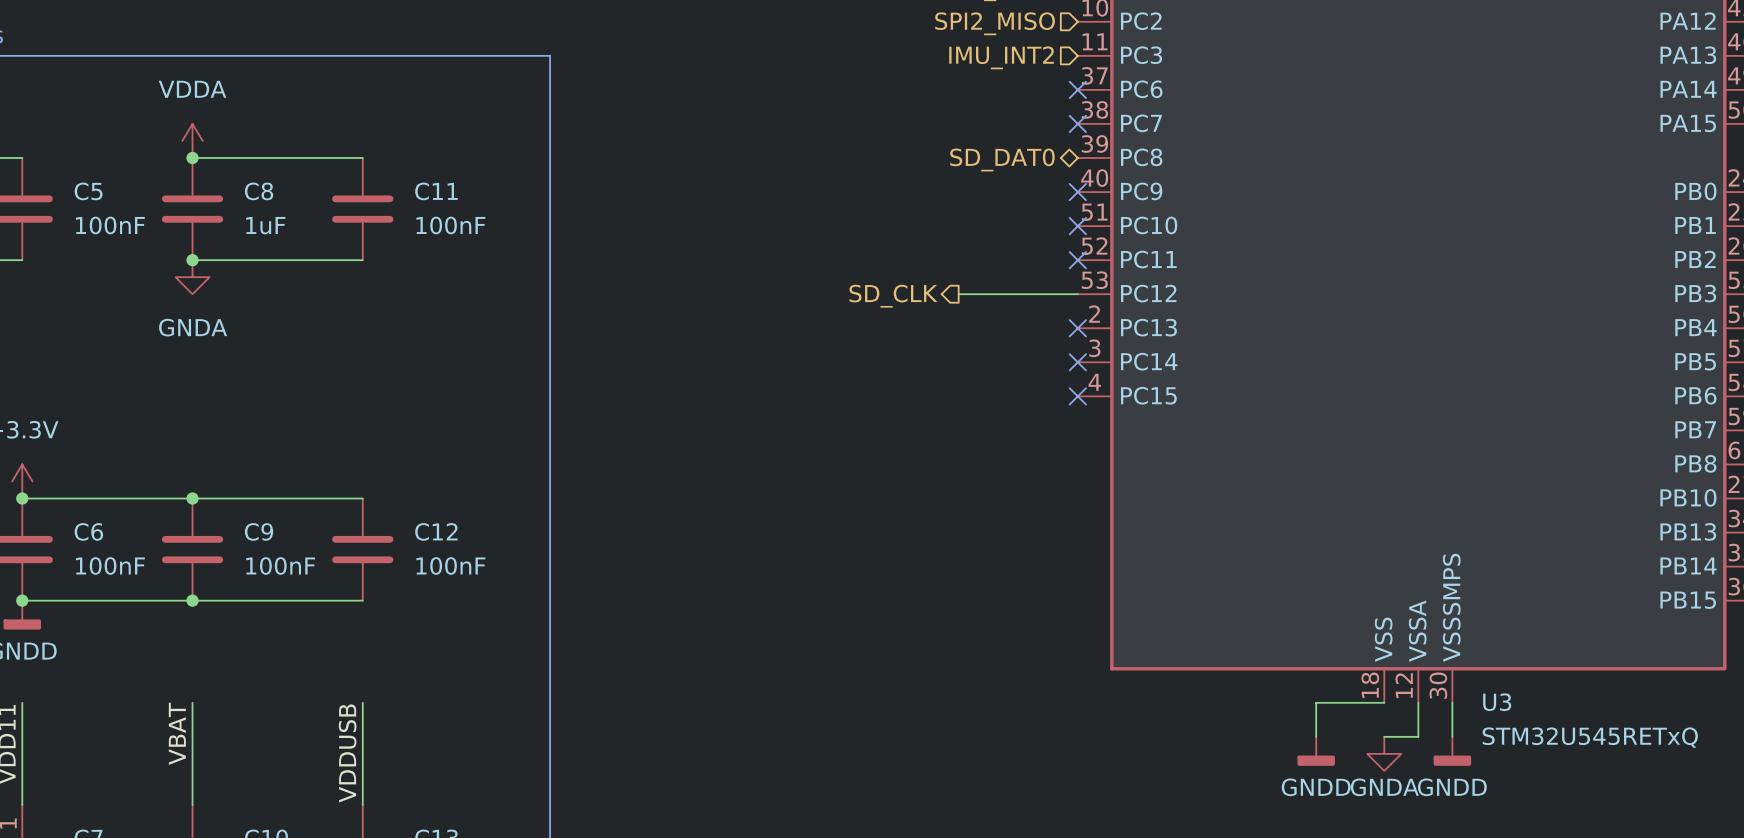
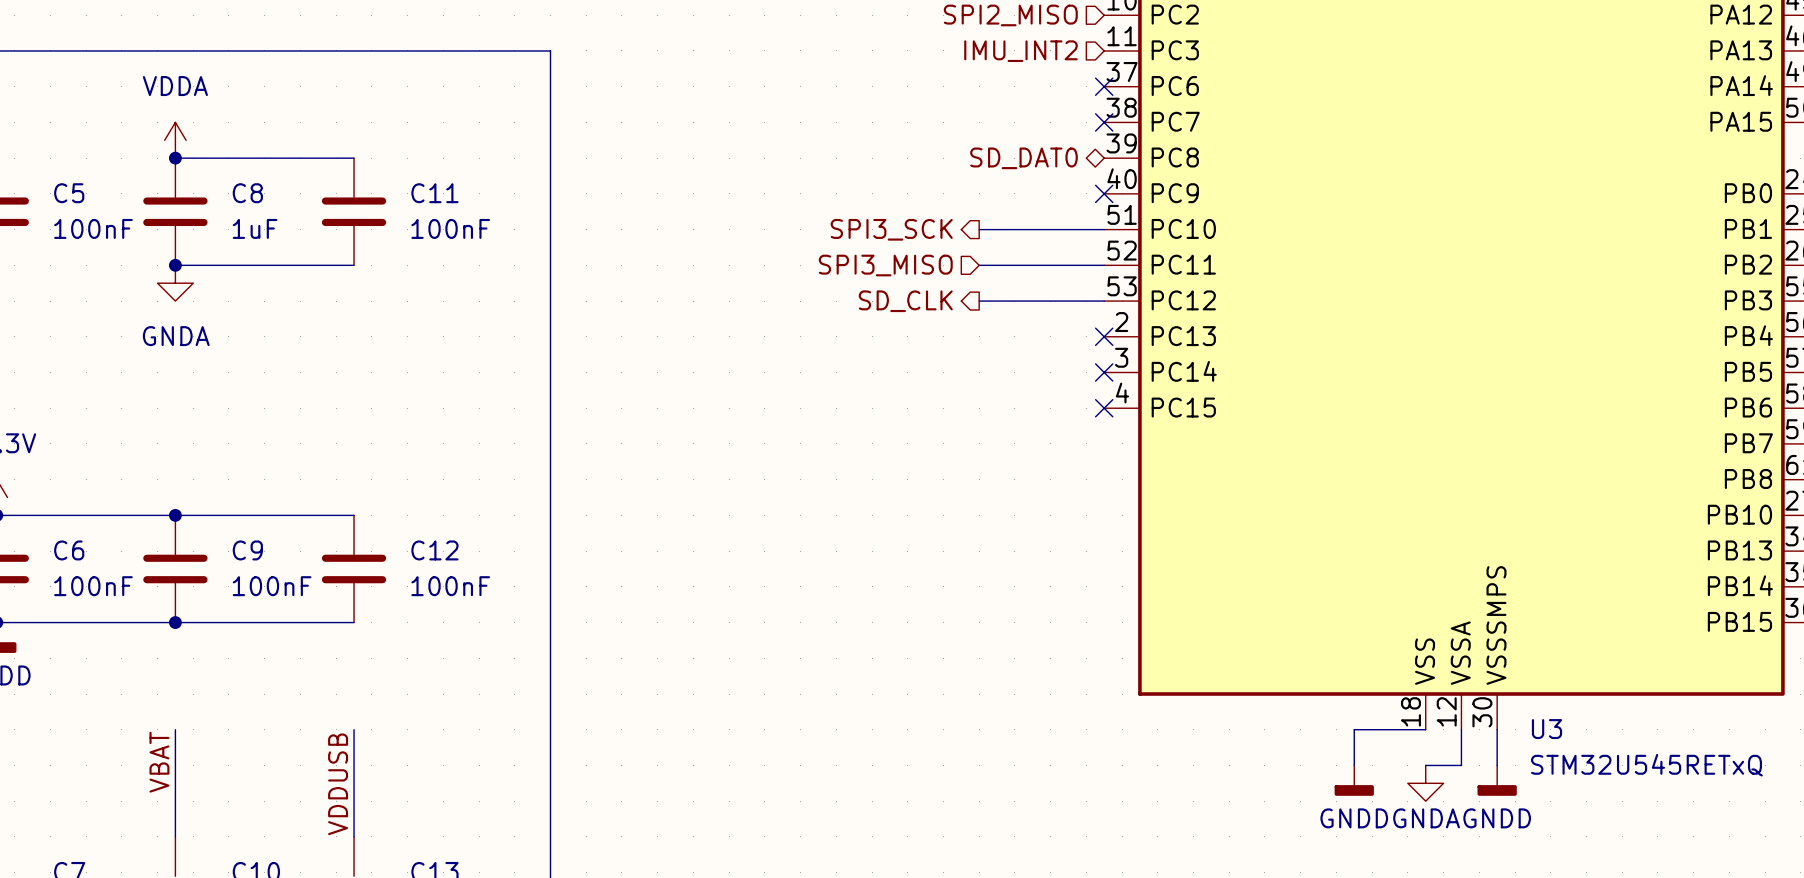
wire: none -> (979, 229) (1104, 229)
no-connect mark: (1077, 226) -> none
hierarchical label: none -> SPI3_SCK (891, 229)
wire: none -> (979, 265) (1104, 265)
no-connect mark: (1077, 260) -> none
hierarchical label: none -> SPI3_MISO (885, 265)

